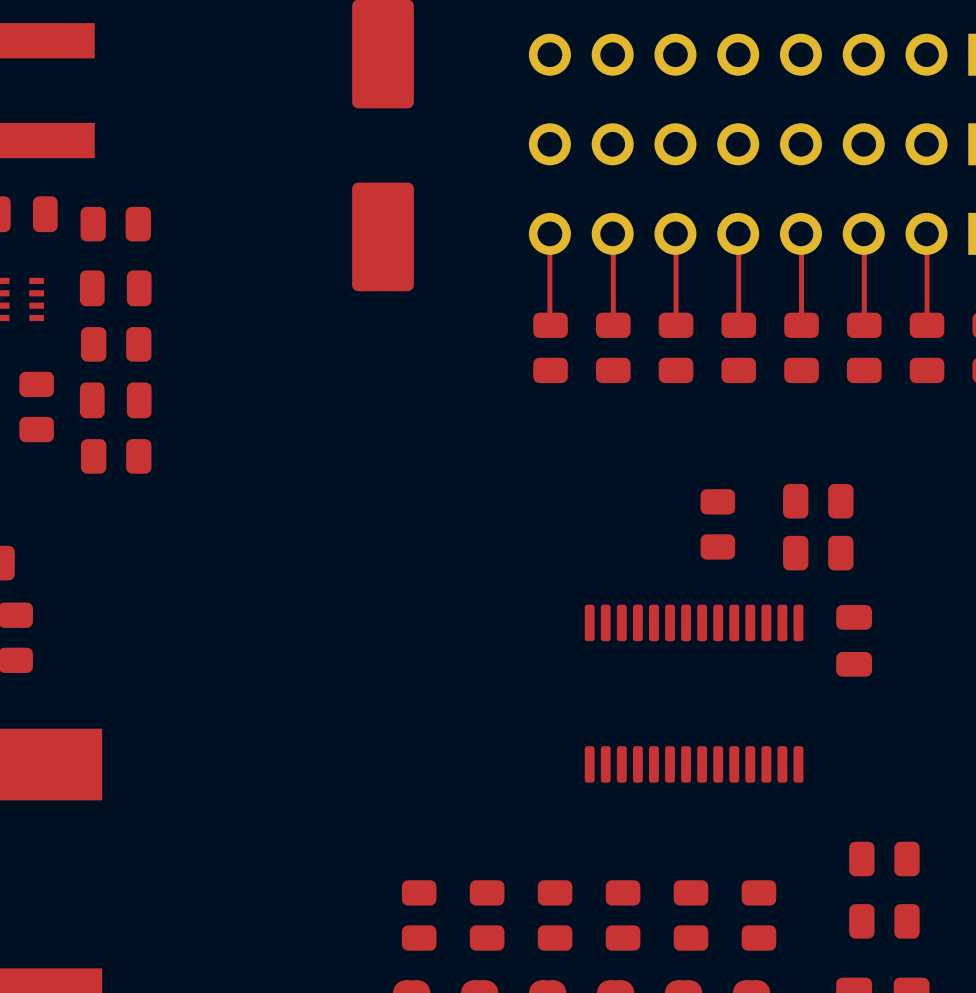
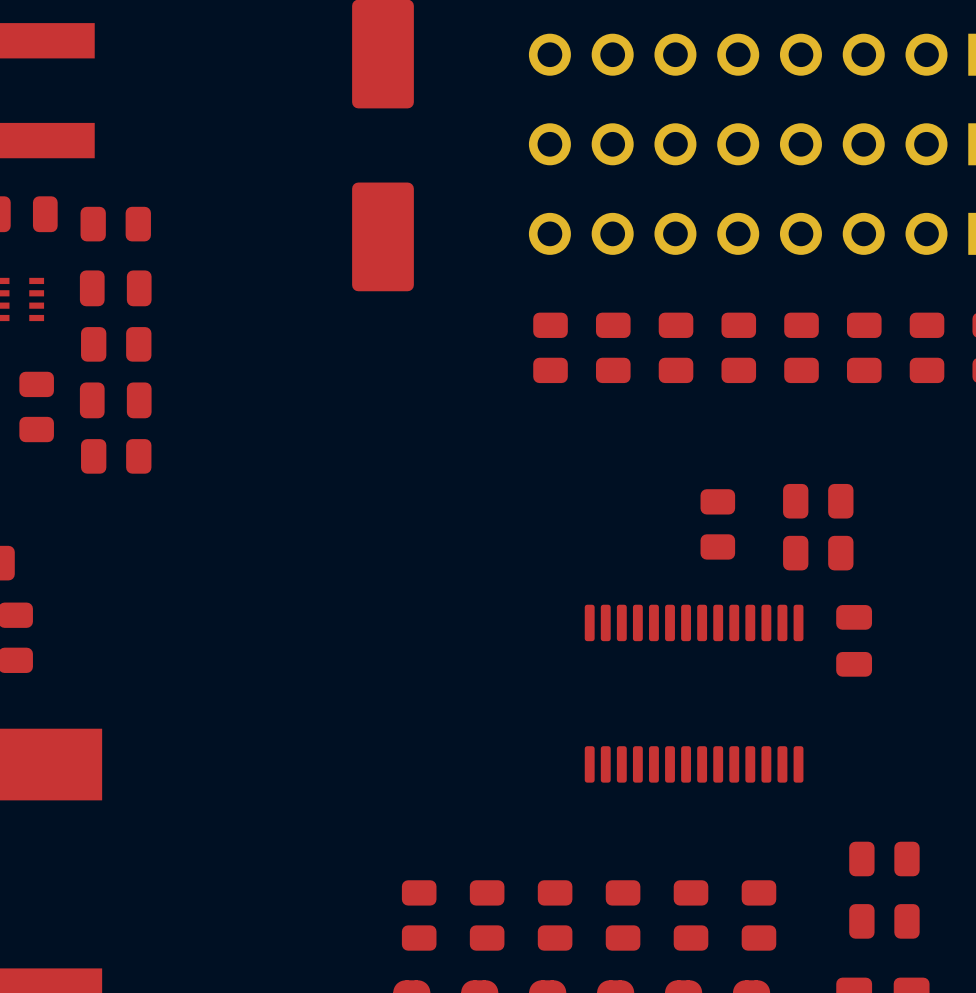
top track: (549, 233) (550, 325) -> none
top track: (612, 233) (613, 325) -> none
top track: (675, 233) (676, 325) -> none
top track: (738, 233) (738, 325) -> none
top track: (800, 233) (801, 325) -> none
top track: (863, 233) (864, 325) -> none
top track: (926, 233) (927, 325) -> none

